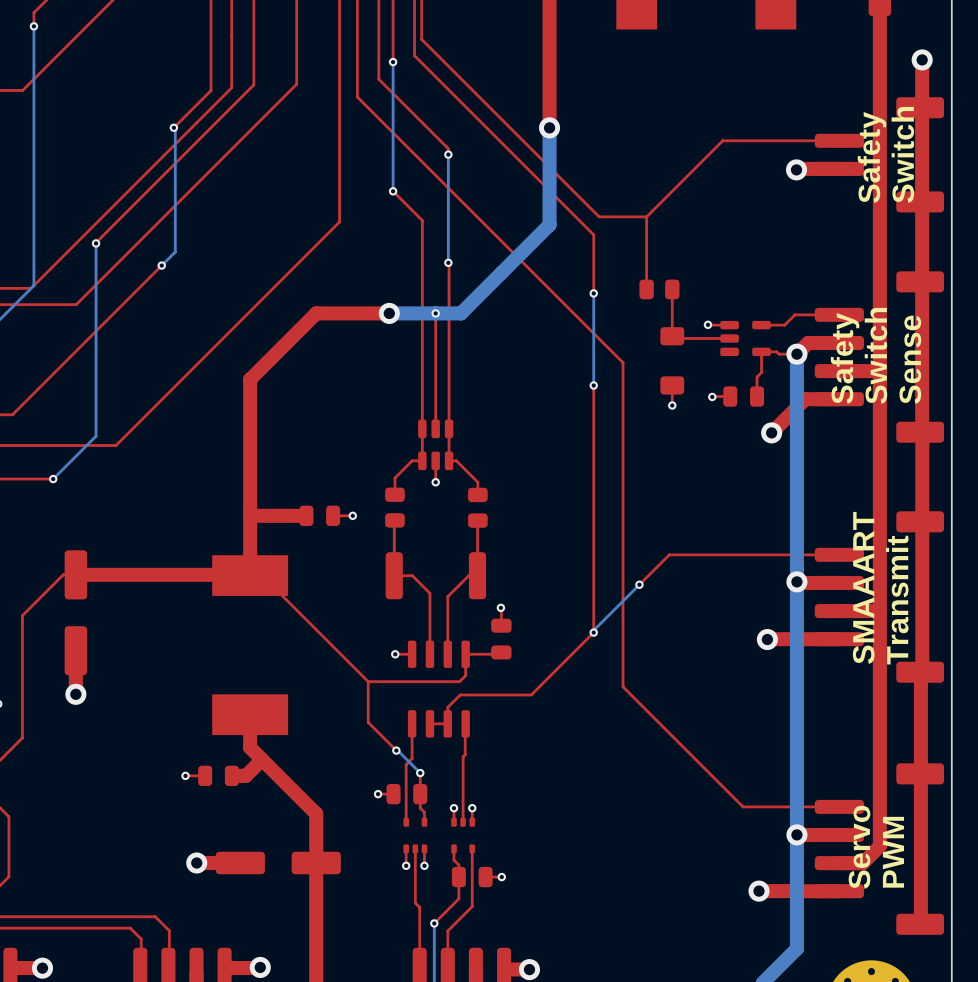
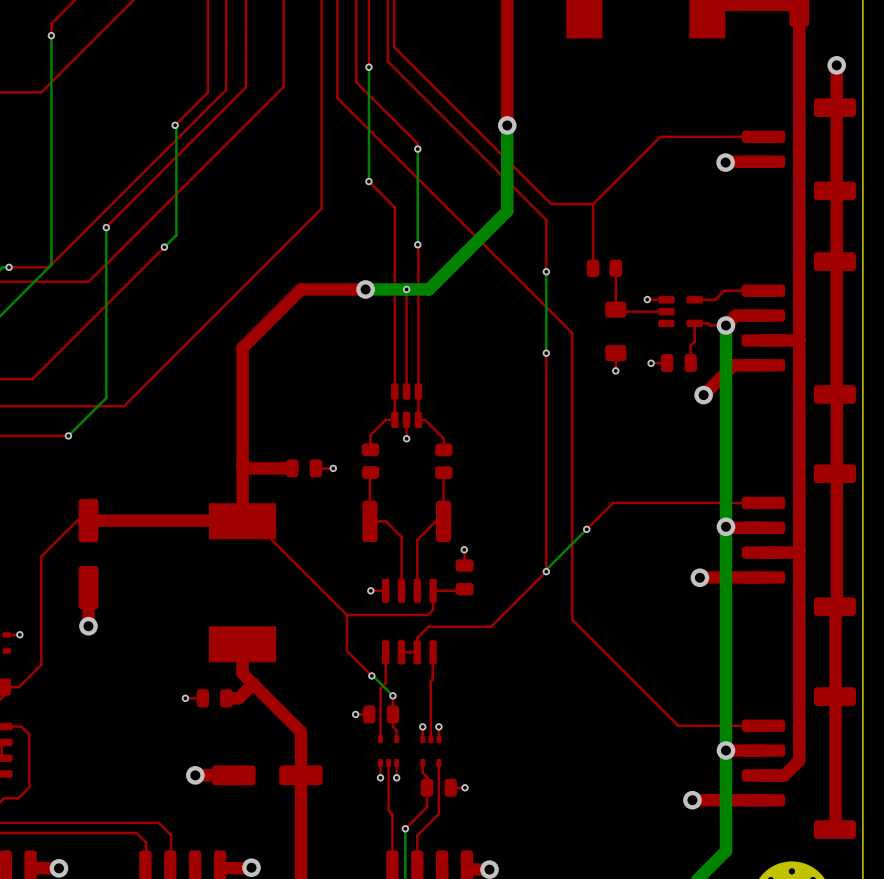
text: Switch (902, 154) -> none
text: Safety (871, 157) -> none
text: Switch (875, 355) -> none
text: Safety (845, 358) -> none
text: Sense (910, 359) -> none
text: SMAAART (863, 587) -> none
text: Transmit (897, 600) -> none
text: Servo (859, 847) -> none
text: PWM (893, 852) -> none

